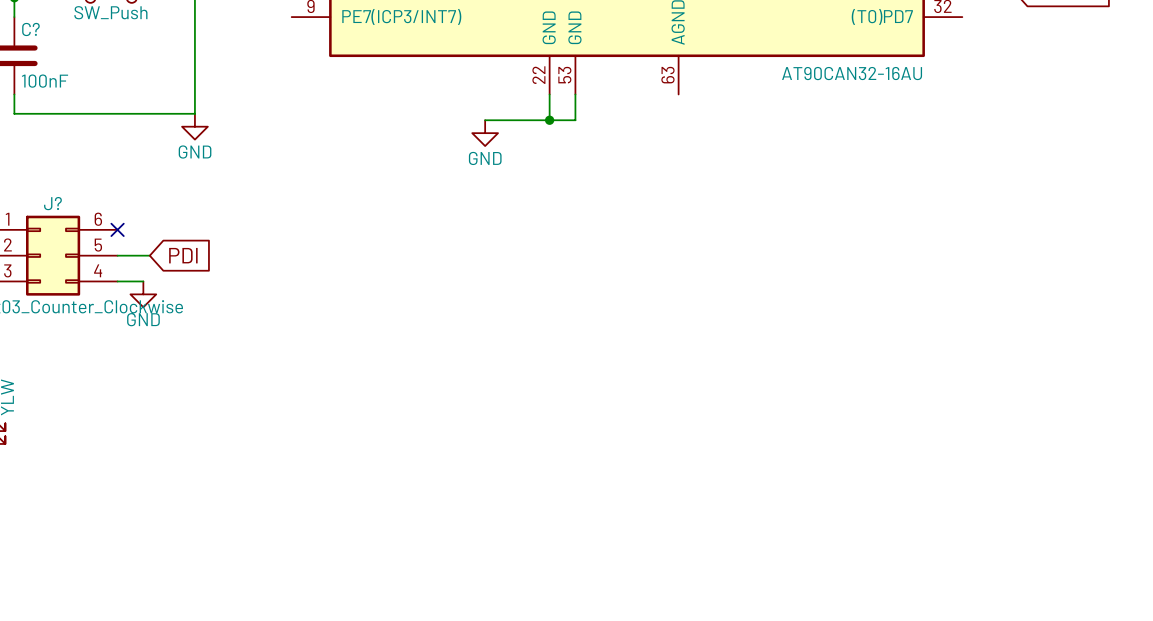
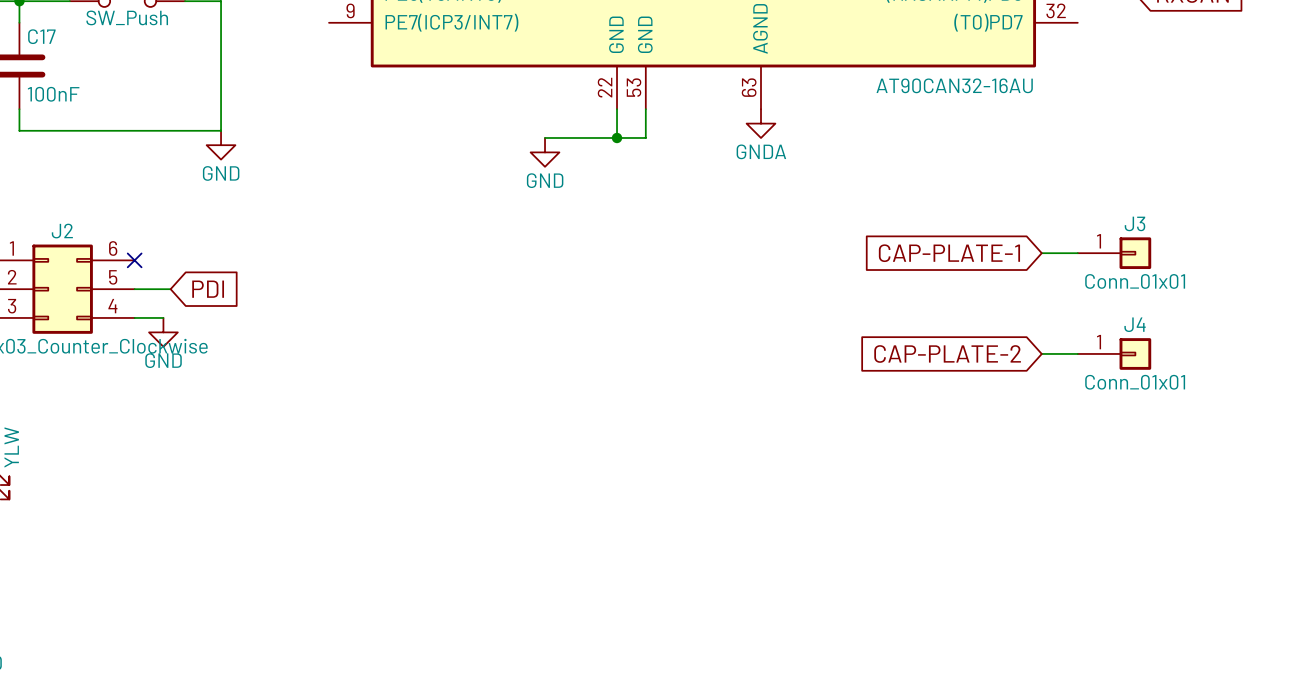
C? name: C? (30, 29) -> C17 (41, 36)
power symbol: none -> GNDA (761, 123)
J? name: J? (52, 203) -> J2 (62, 231)
global label: none -> CAP-PLATE-1 (949, 253)
wire: none -> (1041, 253) (1077, 253)
J3: none -> Conn_01x01 (1114, 253)
global label: none -> CAP-PLATE-2 (947, 353)
wire: none -> (1041, 353) (1077, 353)
J4: none -> Conn_01x01 (1114, 353)

